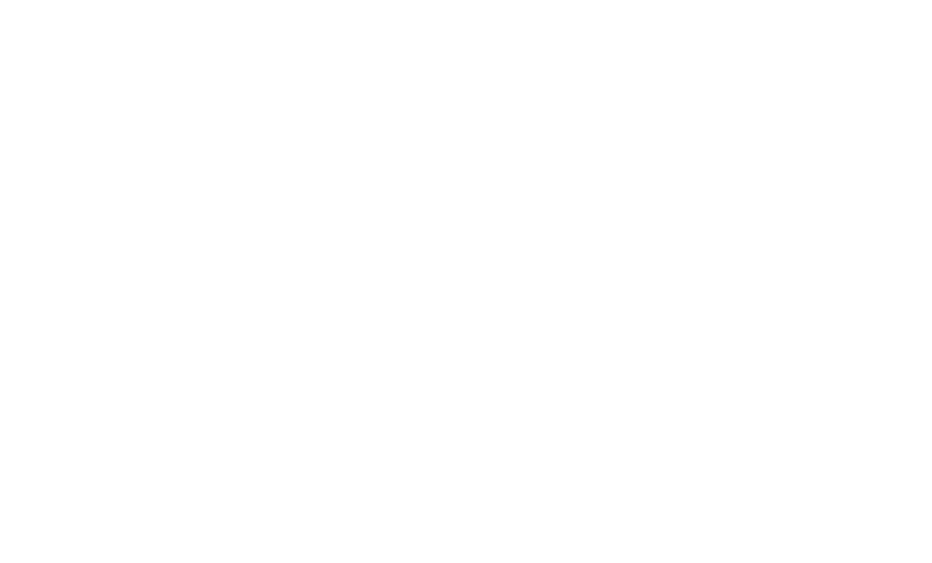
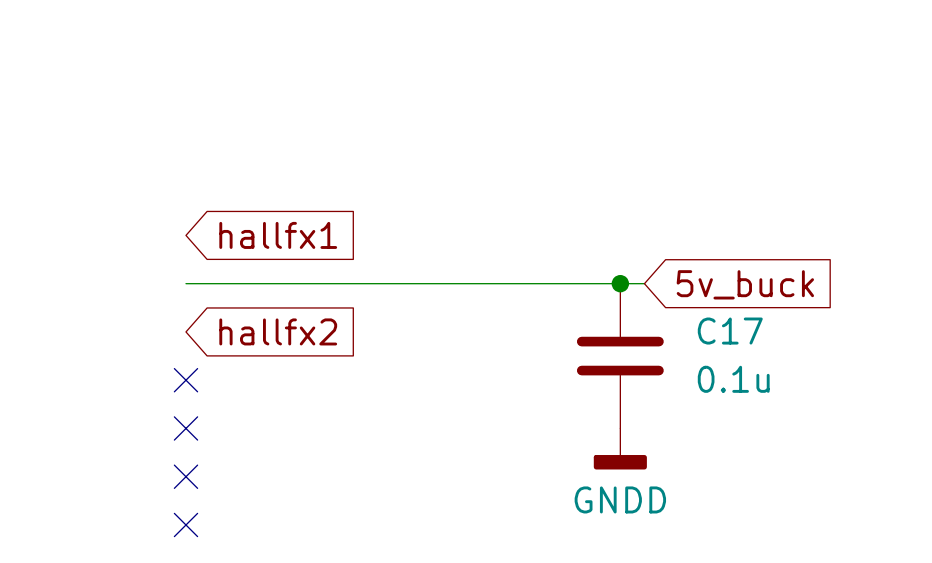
global label: none -> hallfx1 (278, 235)
wire: none -> (185, 283) (644, 283)
junction: none -> (620, 283)
global label: none -> 5v_buck (745, 284)
global label: none -> hallfx2 (278, 331)
C17: none -> 0.1u (620, 356)
no-connect mark: none -> (185, 380)
no-connect mark: none -> (185, 428)
power symbol: none -> GNDD (620, 448)
no-connect mark: none -> (185, 476)
no-connect mark: none -> (185, 524)

